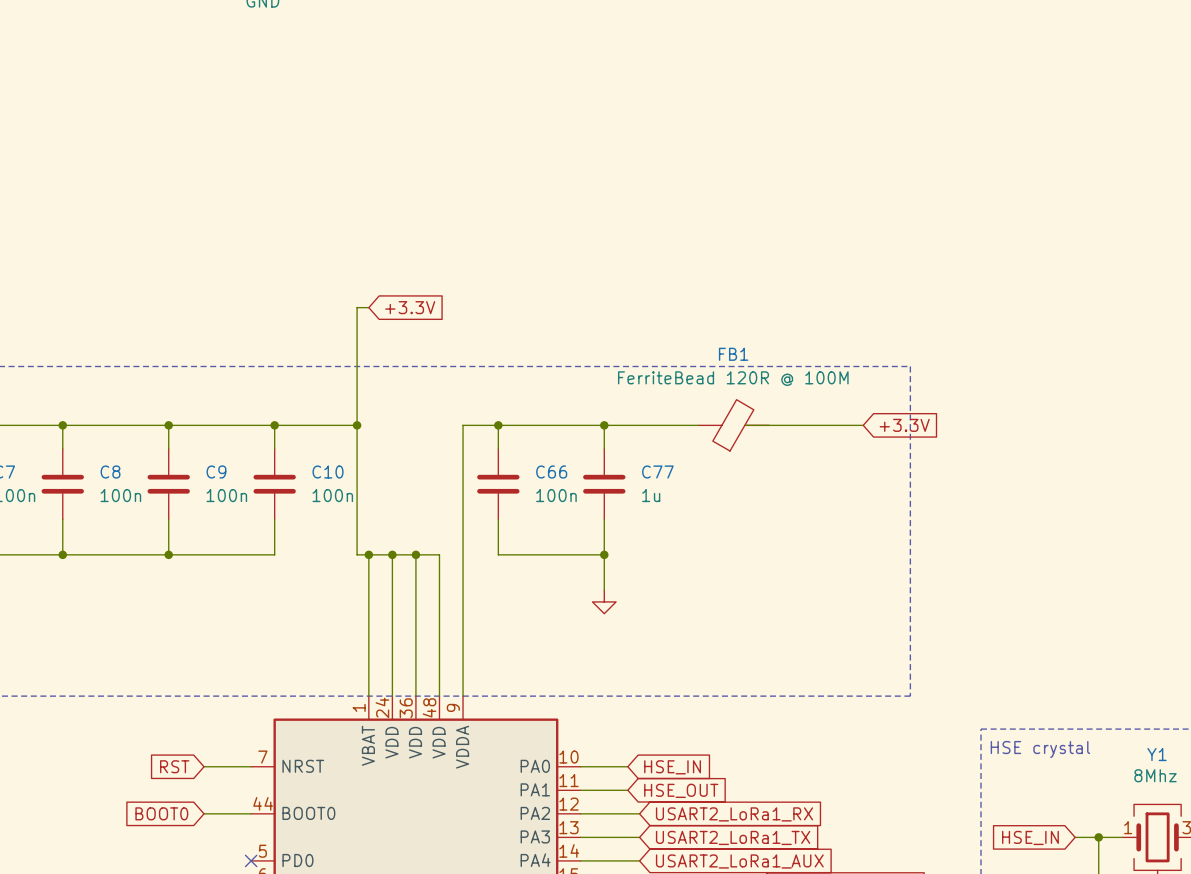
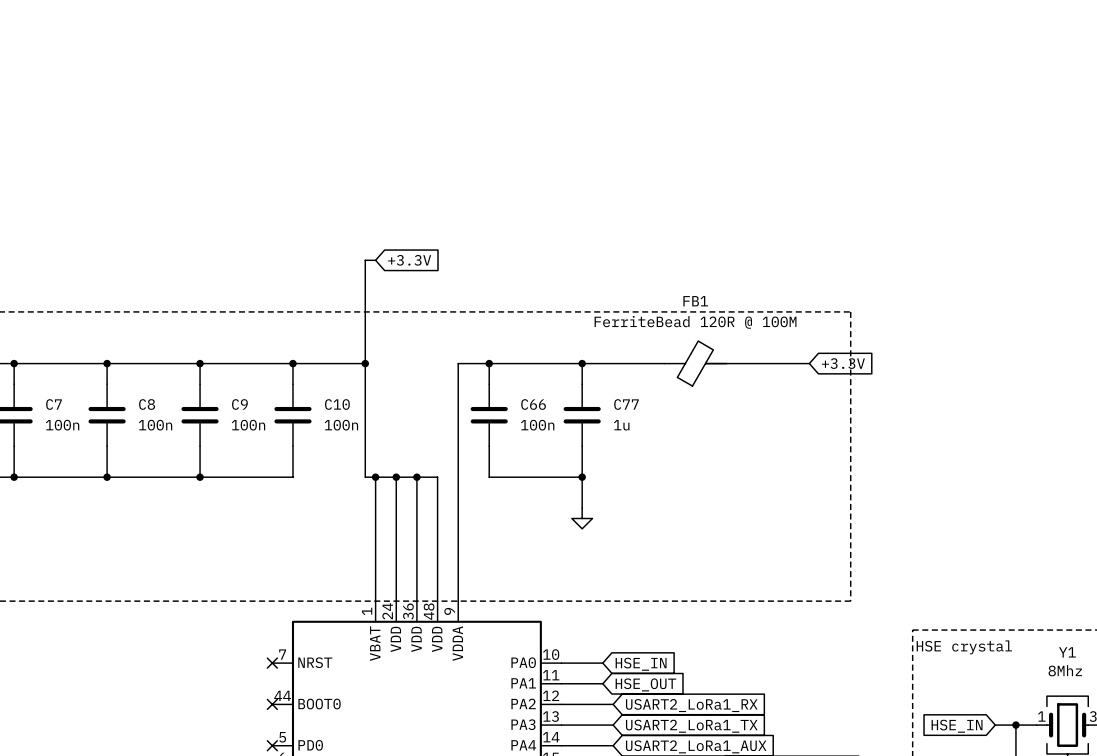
global label: RST (174, 766) -> none
wire: (204, 766) (251, 766) -> none
no-connect mark: none -> (272, 663)
global label: BOOT0 (161, 813) -> none
wire: (204, 813) (251, 813) -> none
no-connect mark: none -> (272, 704)

